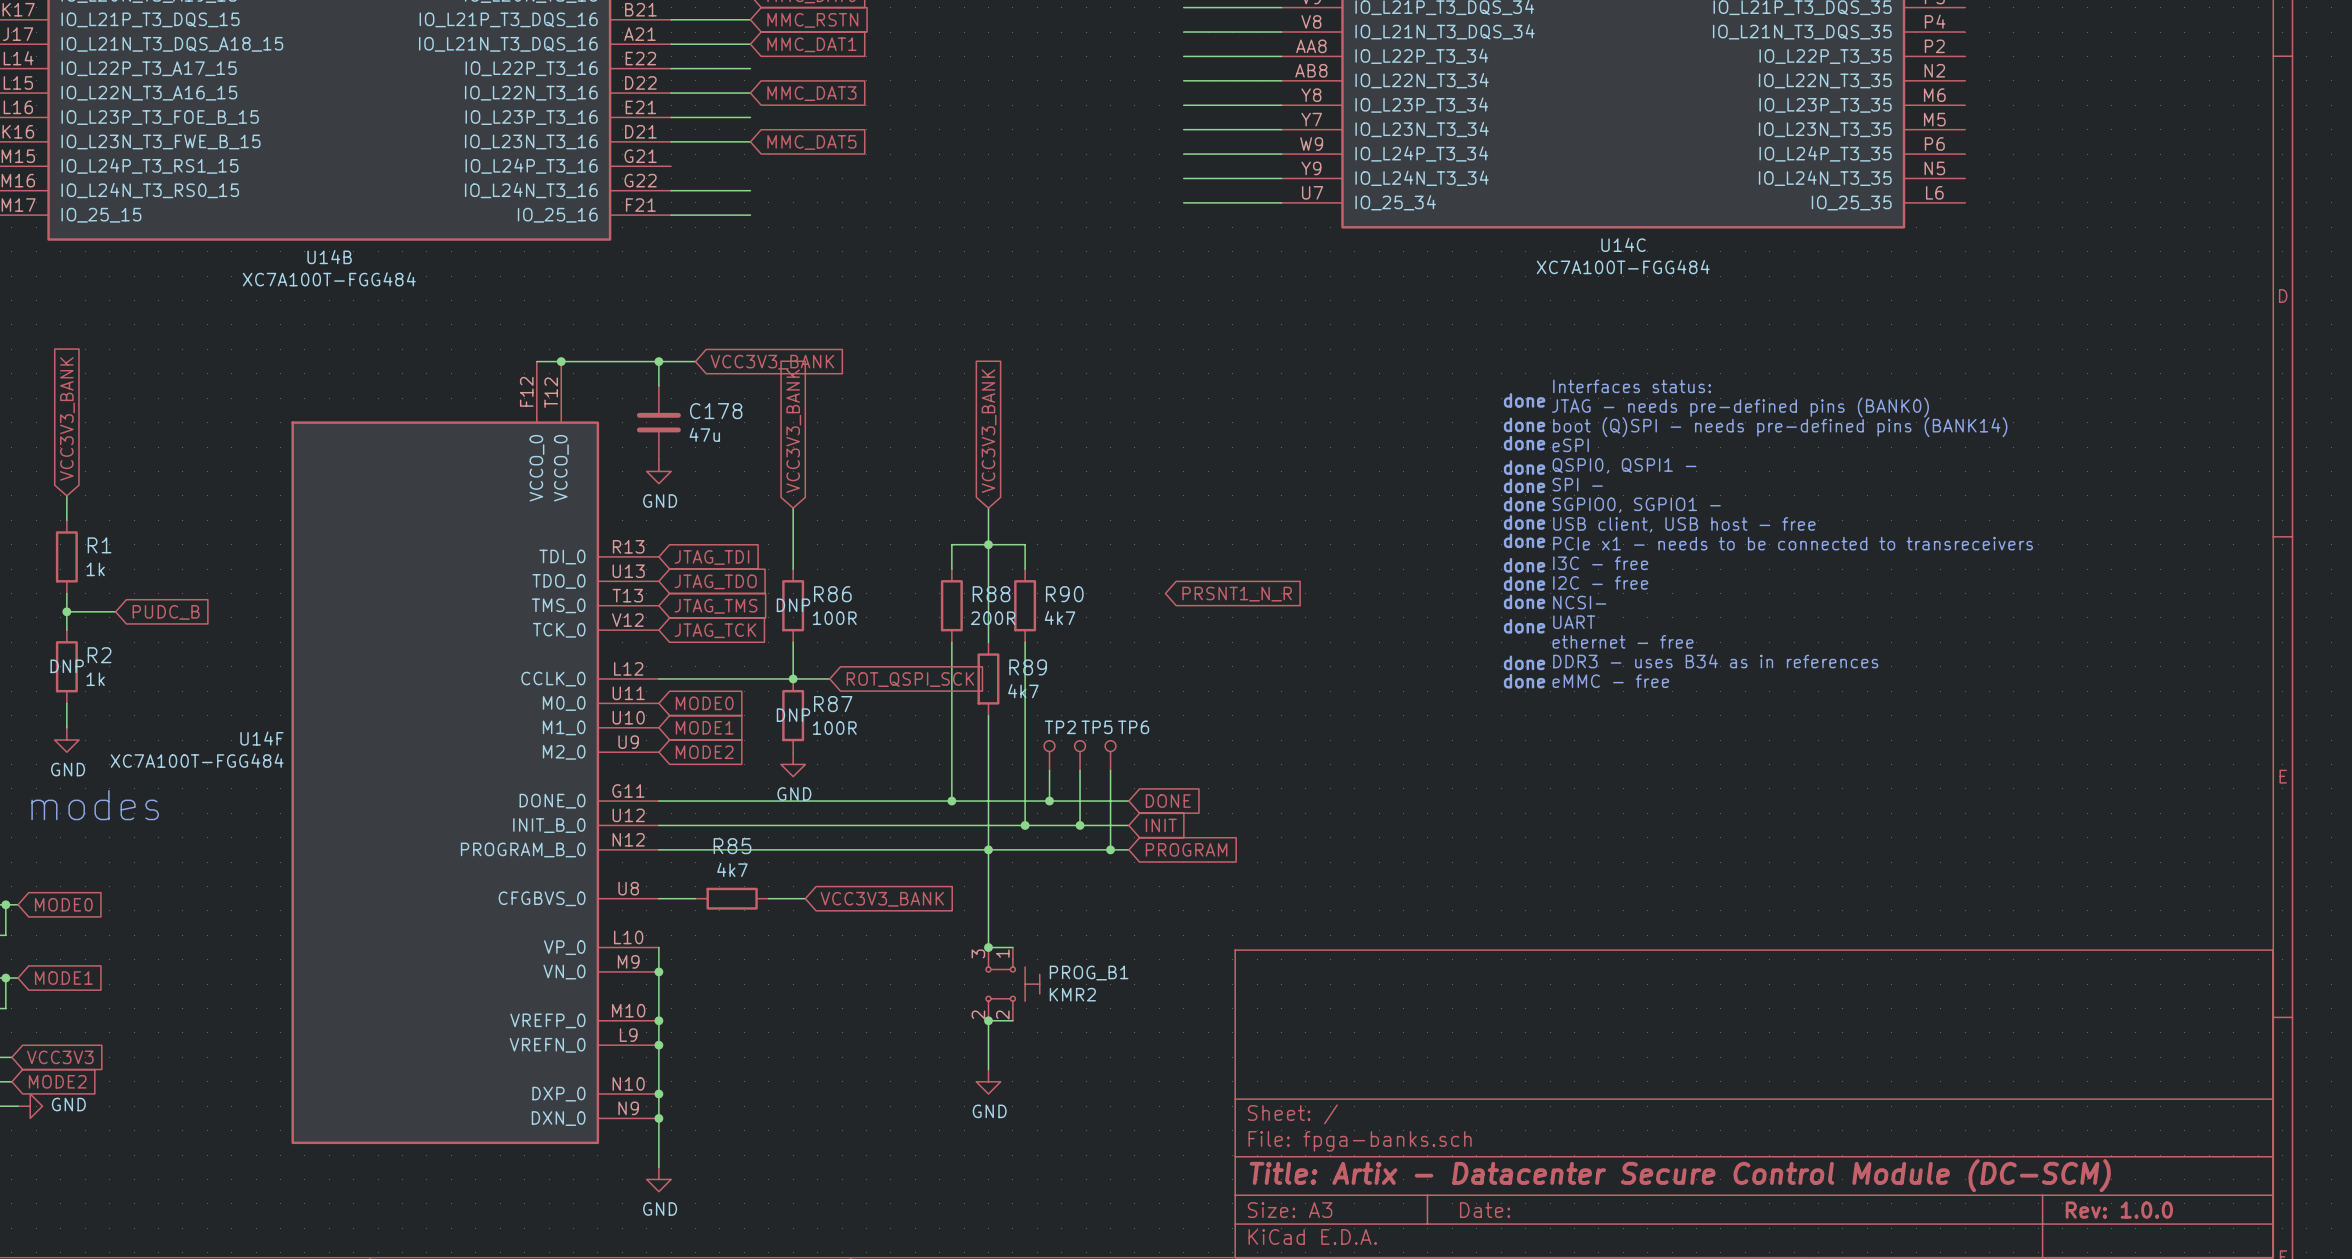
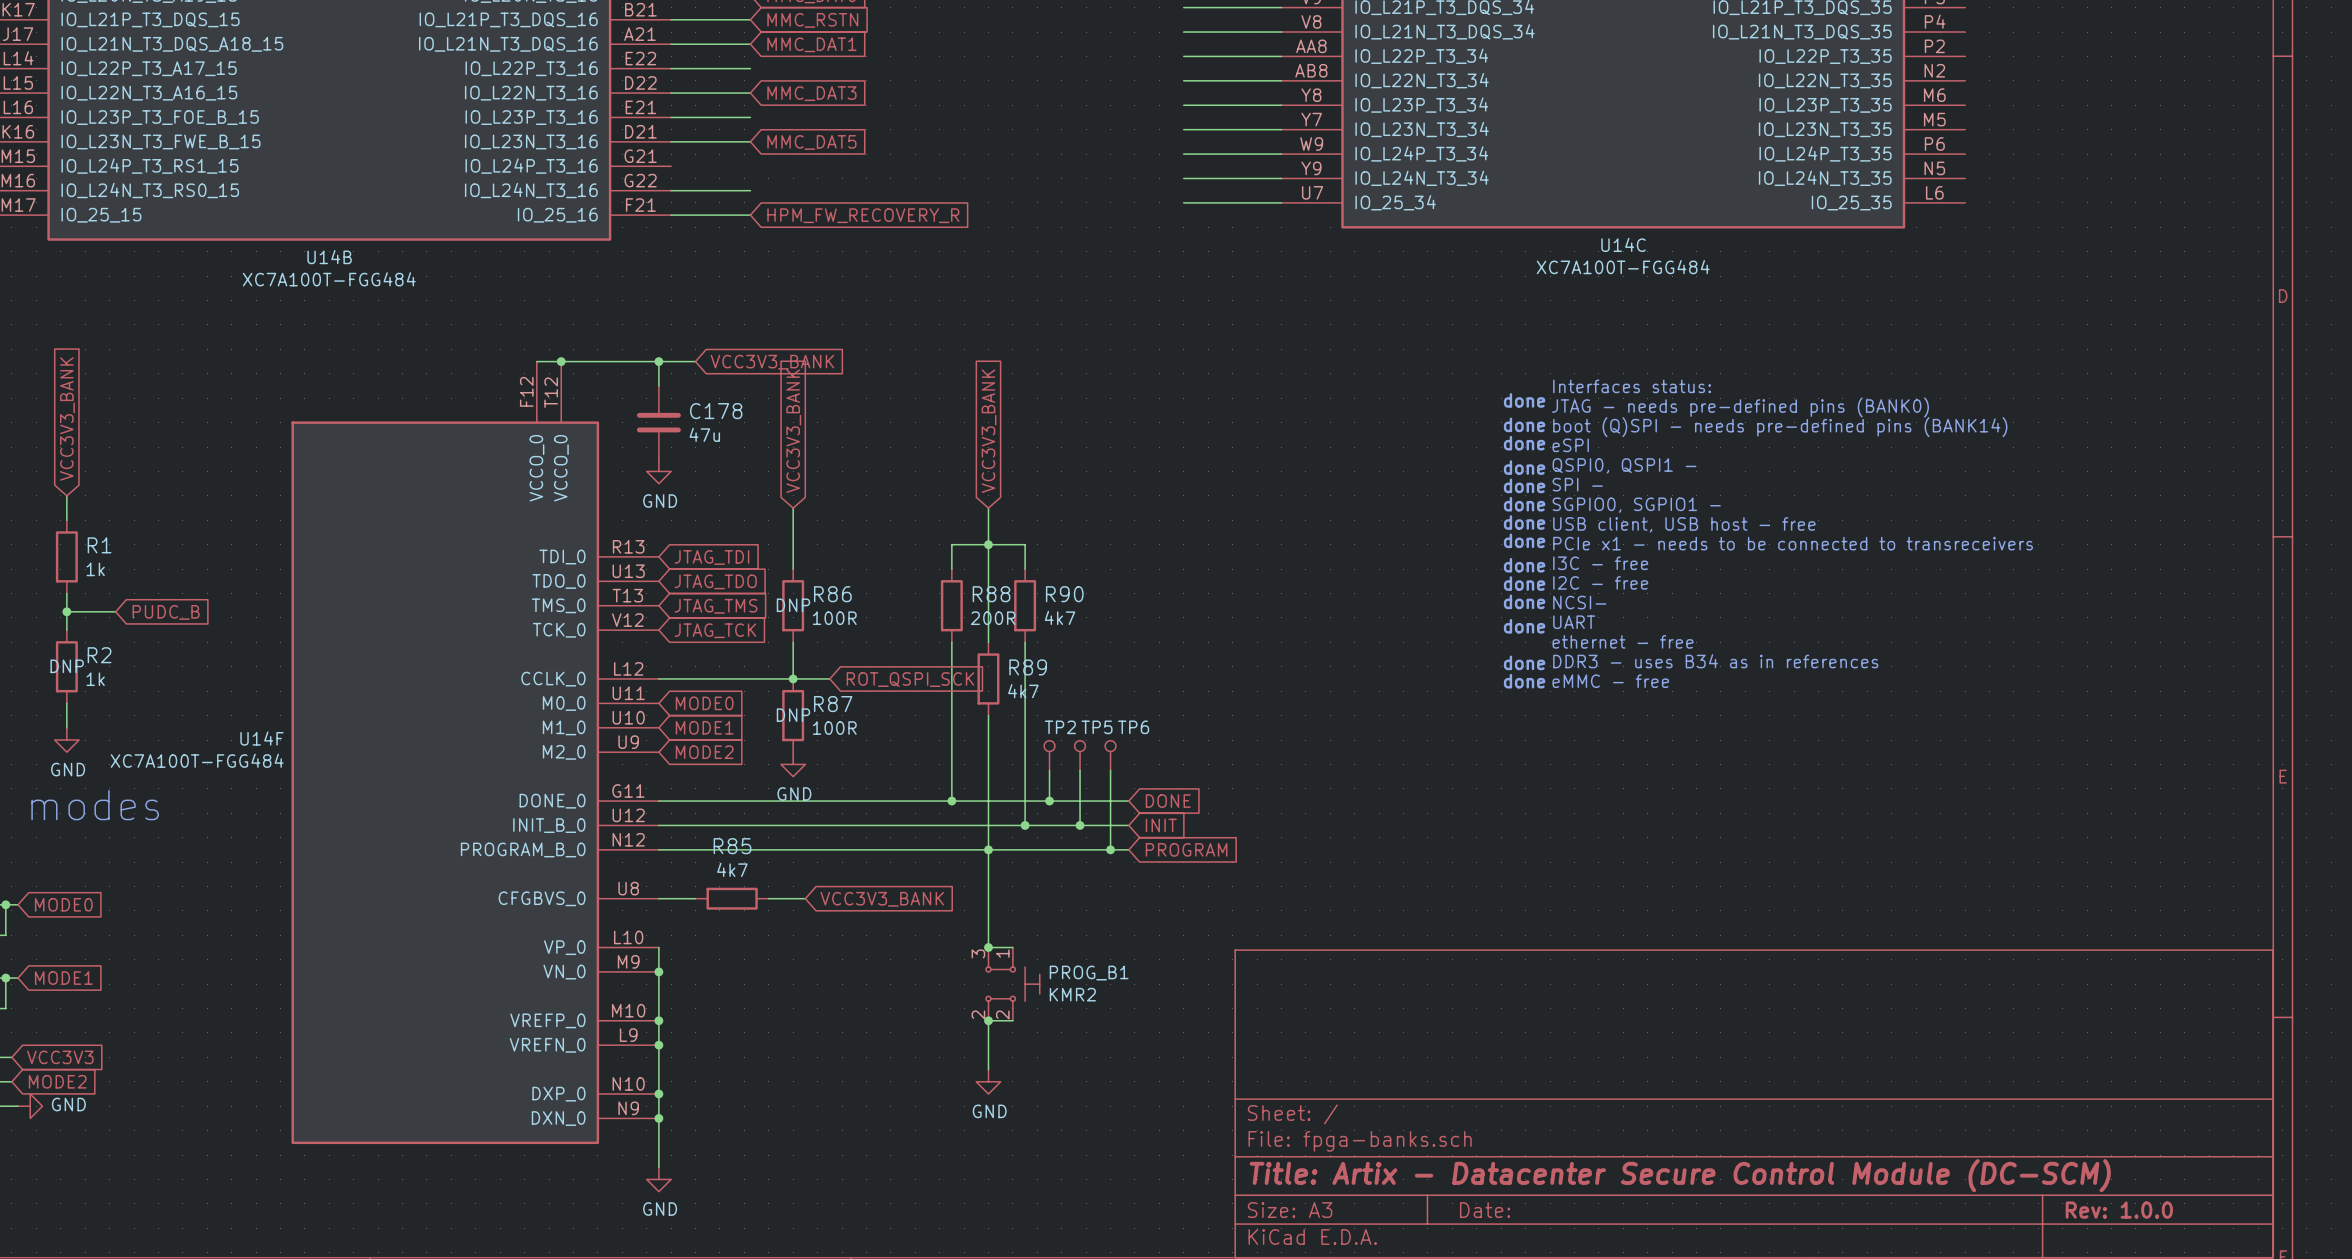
global label: none -> HPM_FW_RECOVERY_R (863, 215)
global label: PRSNT1_N_R (1237, 594) -> none

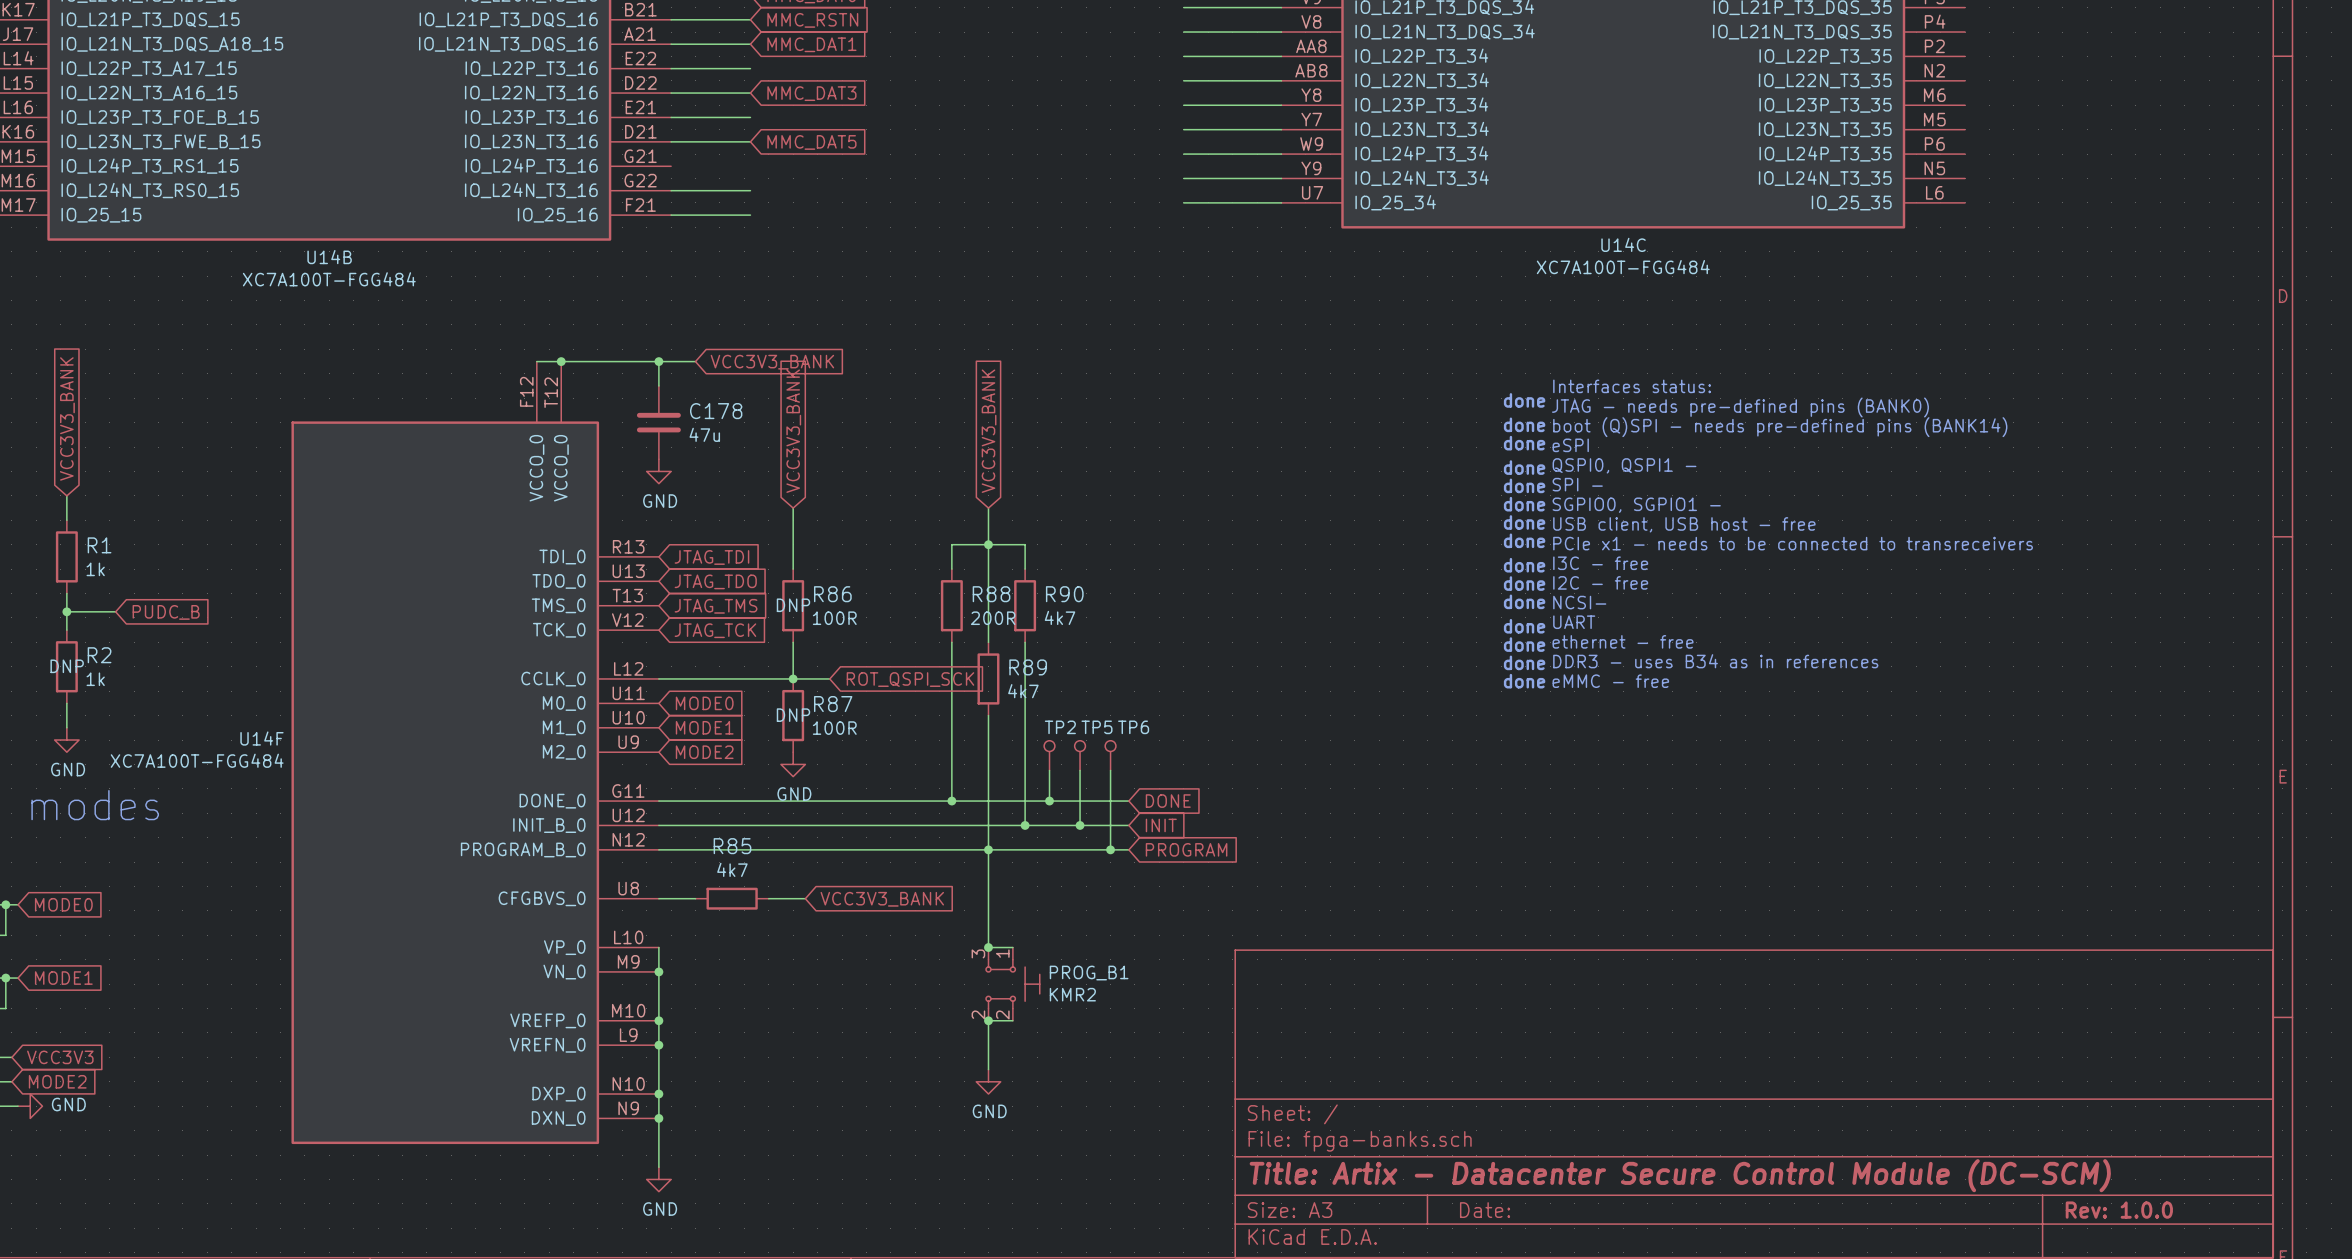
global label: HPM_FW_RECOVERY_R (863, 215) -> none
text: none -> done (1524, 644)

